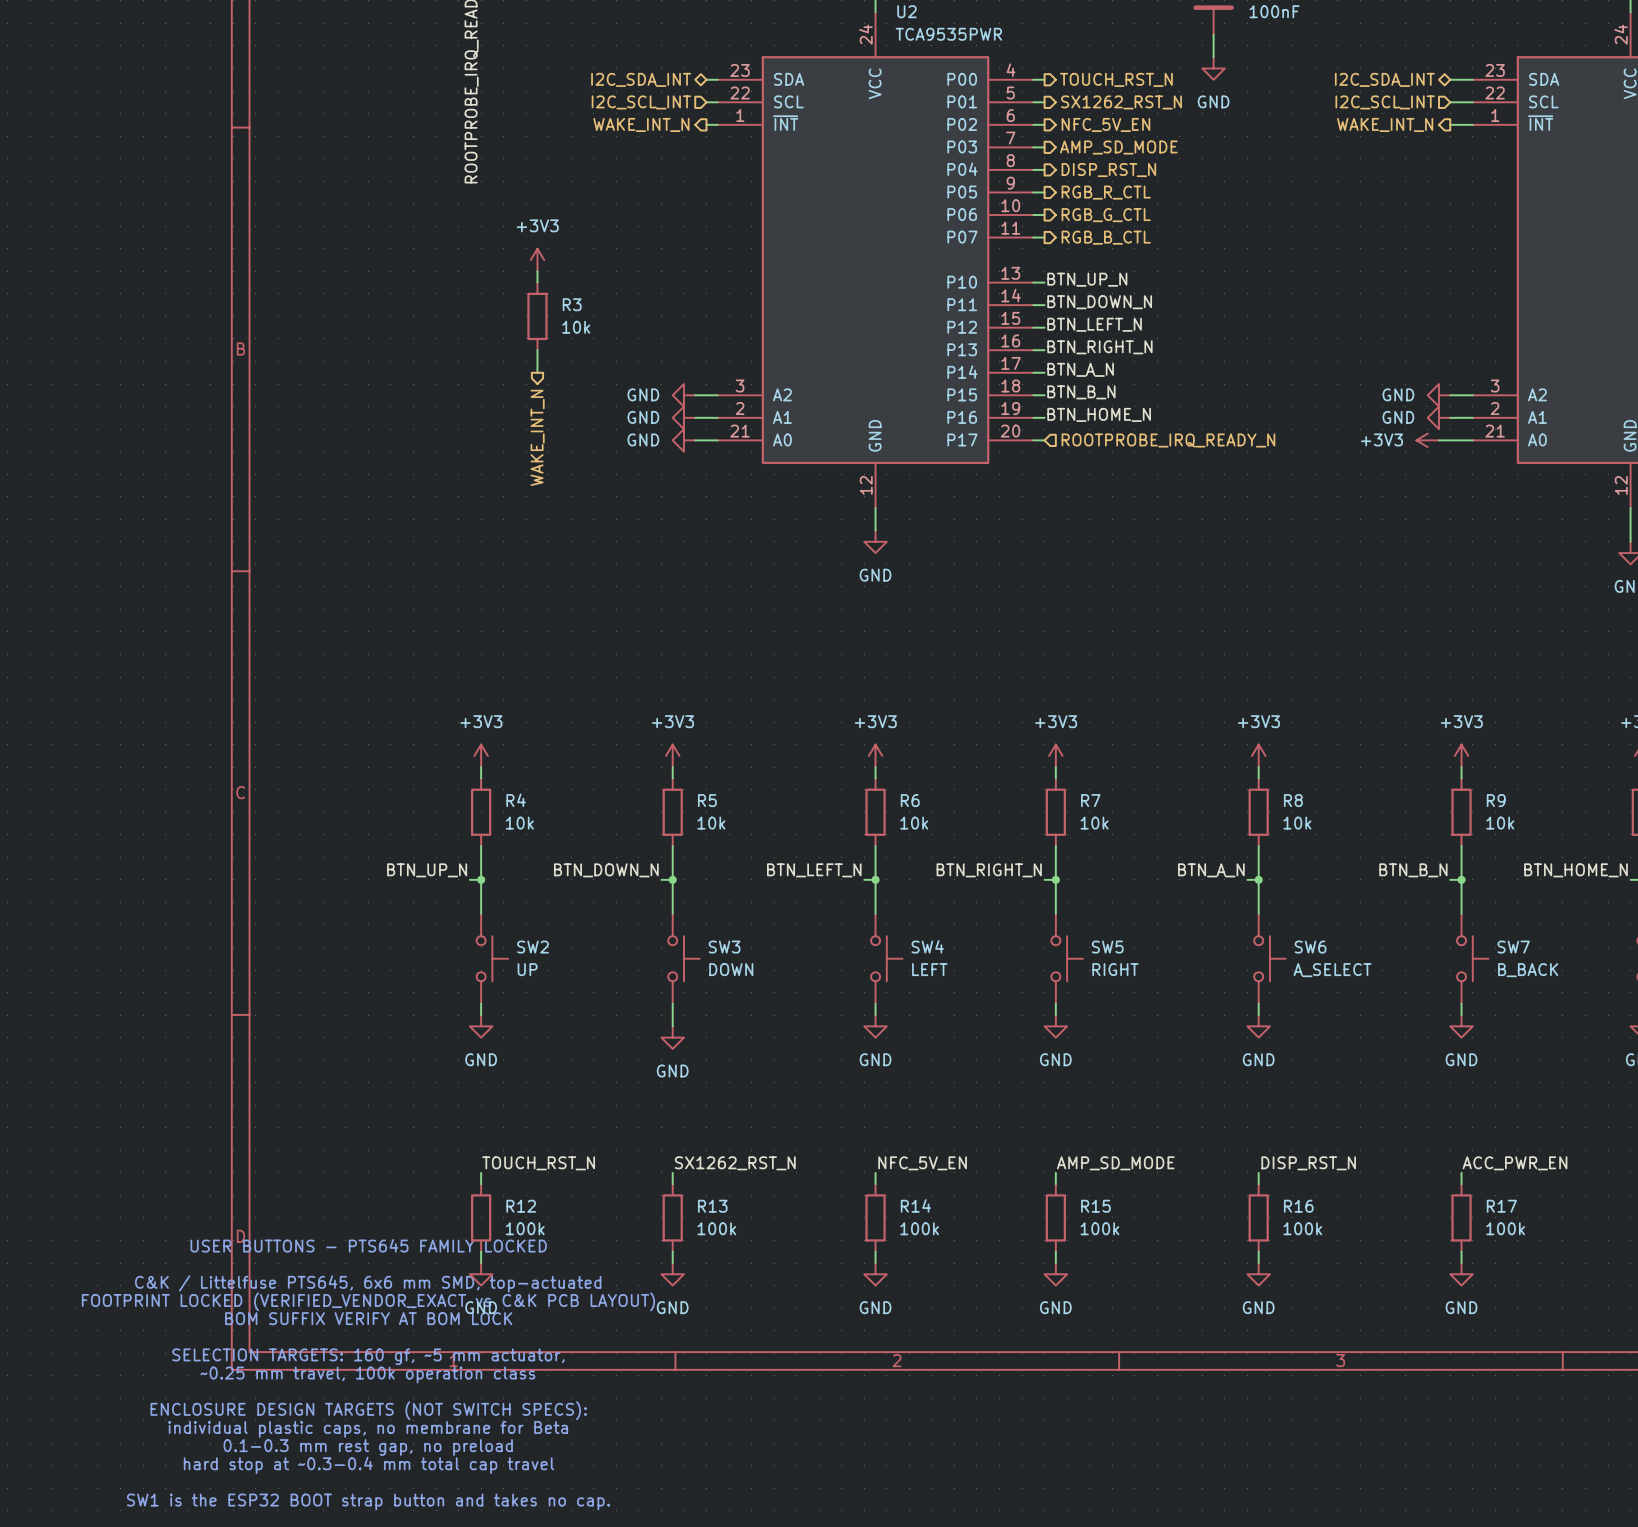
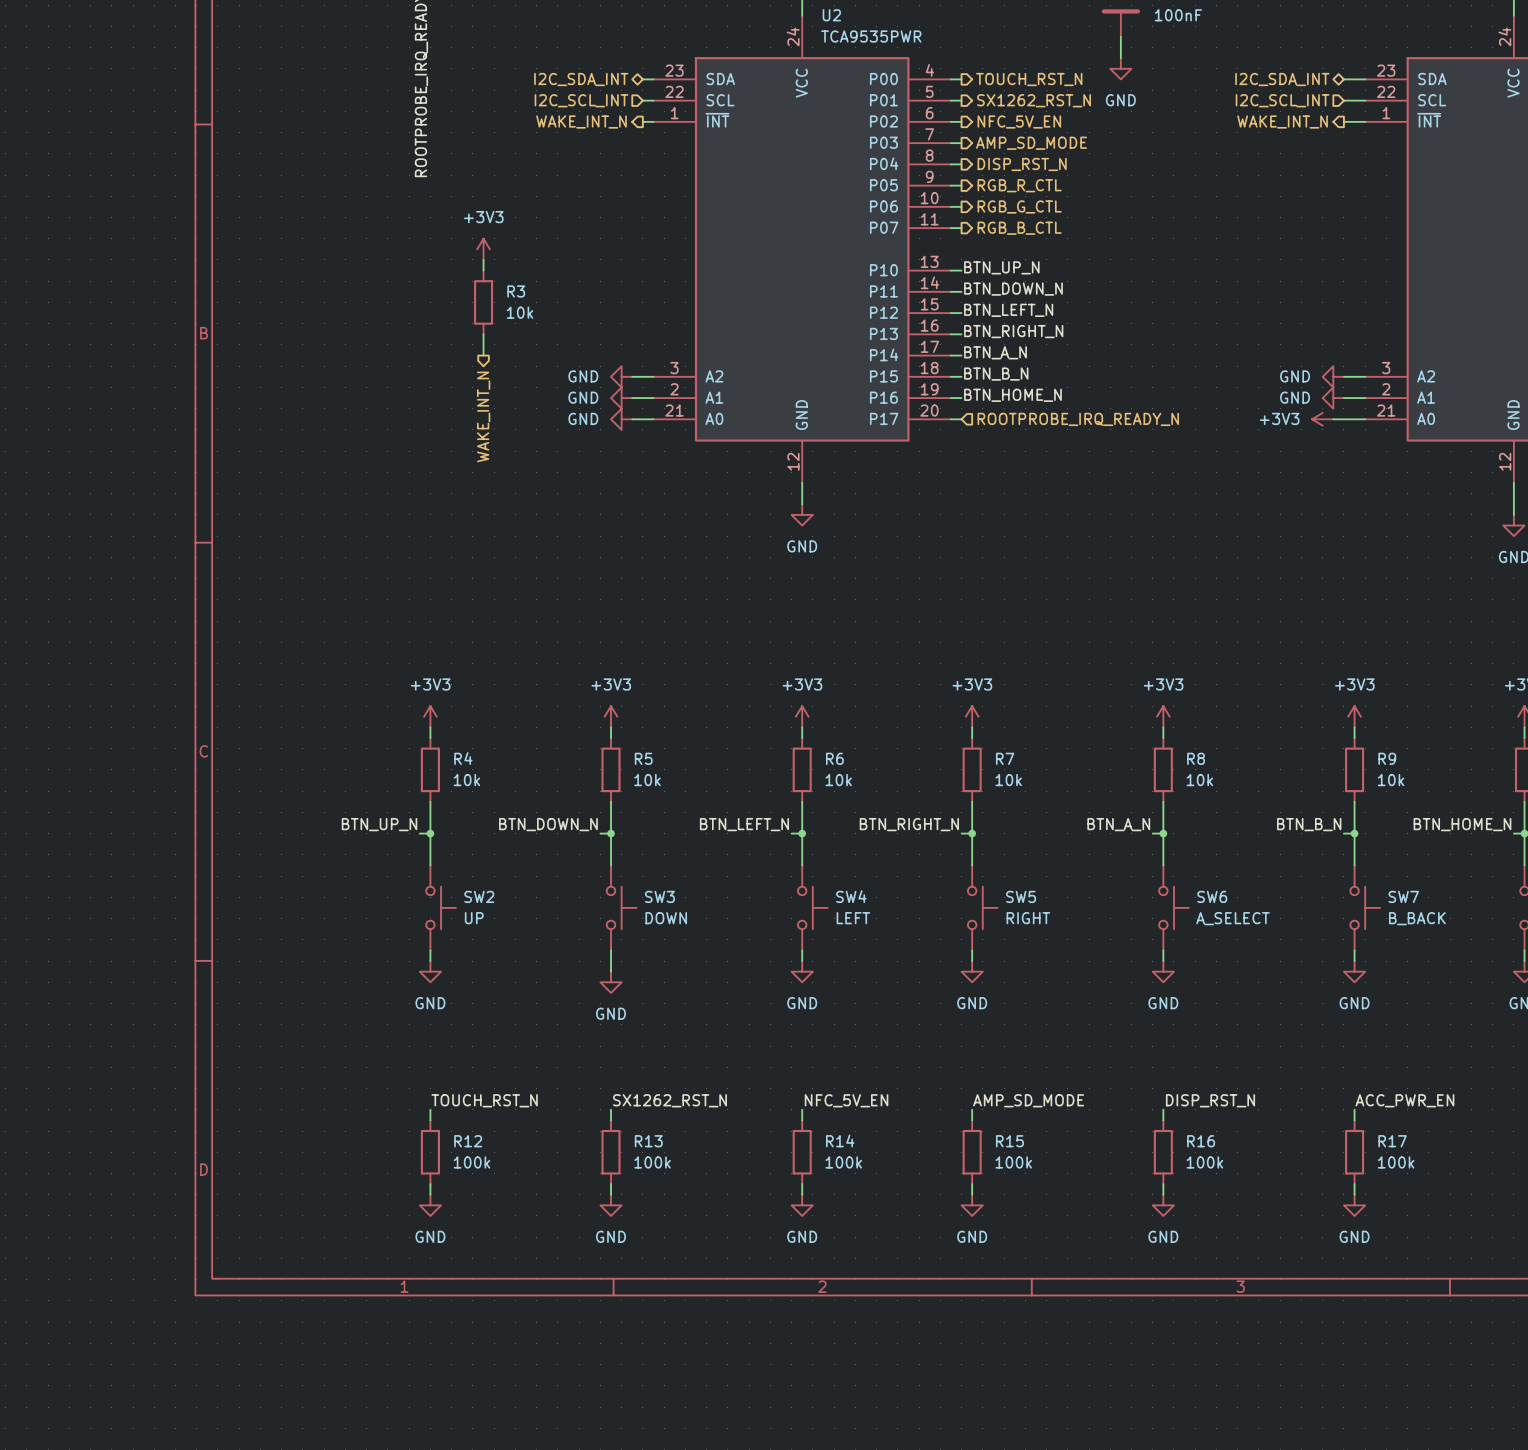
text: USER BUTTONS - PTS645 FAMILY LOCKED (368, 1245) -> none
text: C&K / Littelfuse PTS645, 6x6 mm SMD, top-actuated (368, 1283) -> none
text: FOOTPRINT LOCKED (VERIFIED_VENDOR_EXACT vs C&K PCB LAYOUT) (368, 1301) -> none
text: BOM SUFFIX VERIFY AT BOM LOCK (368, 1318) -> none
text: SELECTION TARGETS: 160 gf, ~5 mm actuator, (368, 1356) -> none
text: ~0.25 mm travel, 100k operation class (367, 1374) -> none
text: ENCLOSURE DESIGN TARGETS (NOT SWITCH SPECS): (368, 1410) -> none
text: individual plastic caps, no membrane for Beta (368, 1429) -> none
text: 0.1-0.3 mm rest gap, no preload (368, 1447) -> none
text: hard stop at ~0.3-0.4 mm total cap travel (368, 1465) -> none
text: SW1 is the ESP32 BOOT strap button and takes no cap. (368, 1501) -> none

